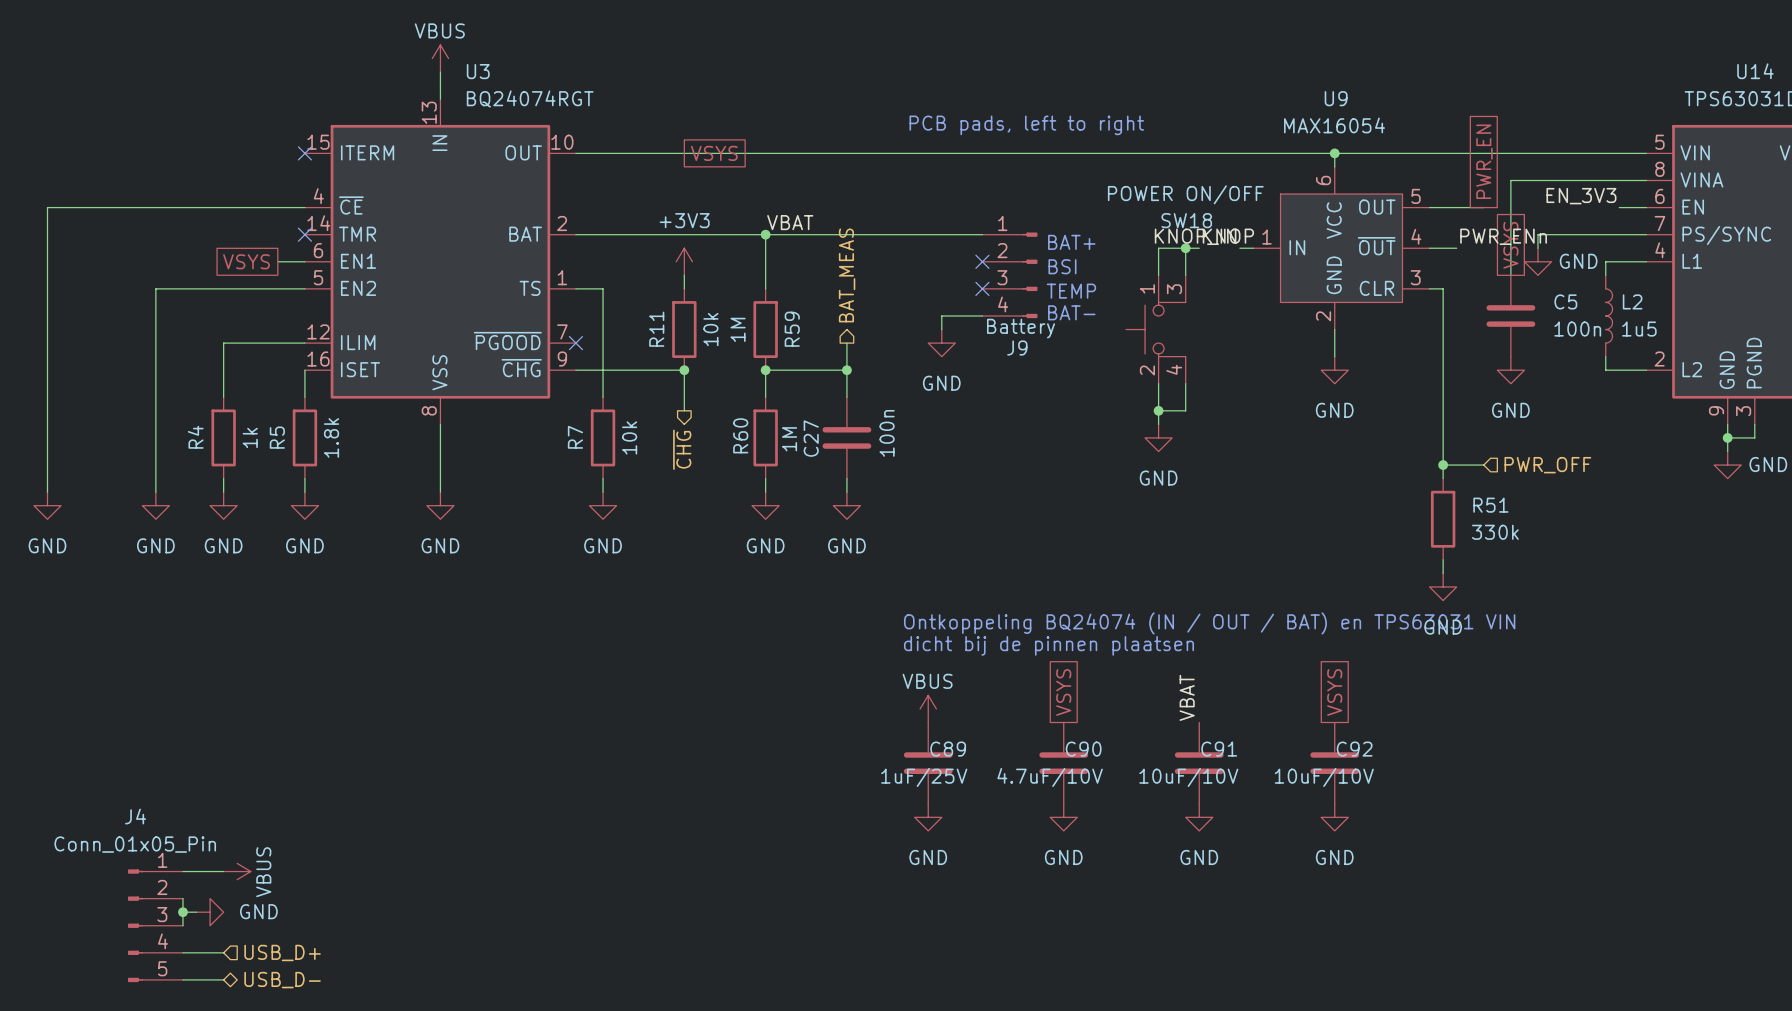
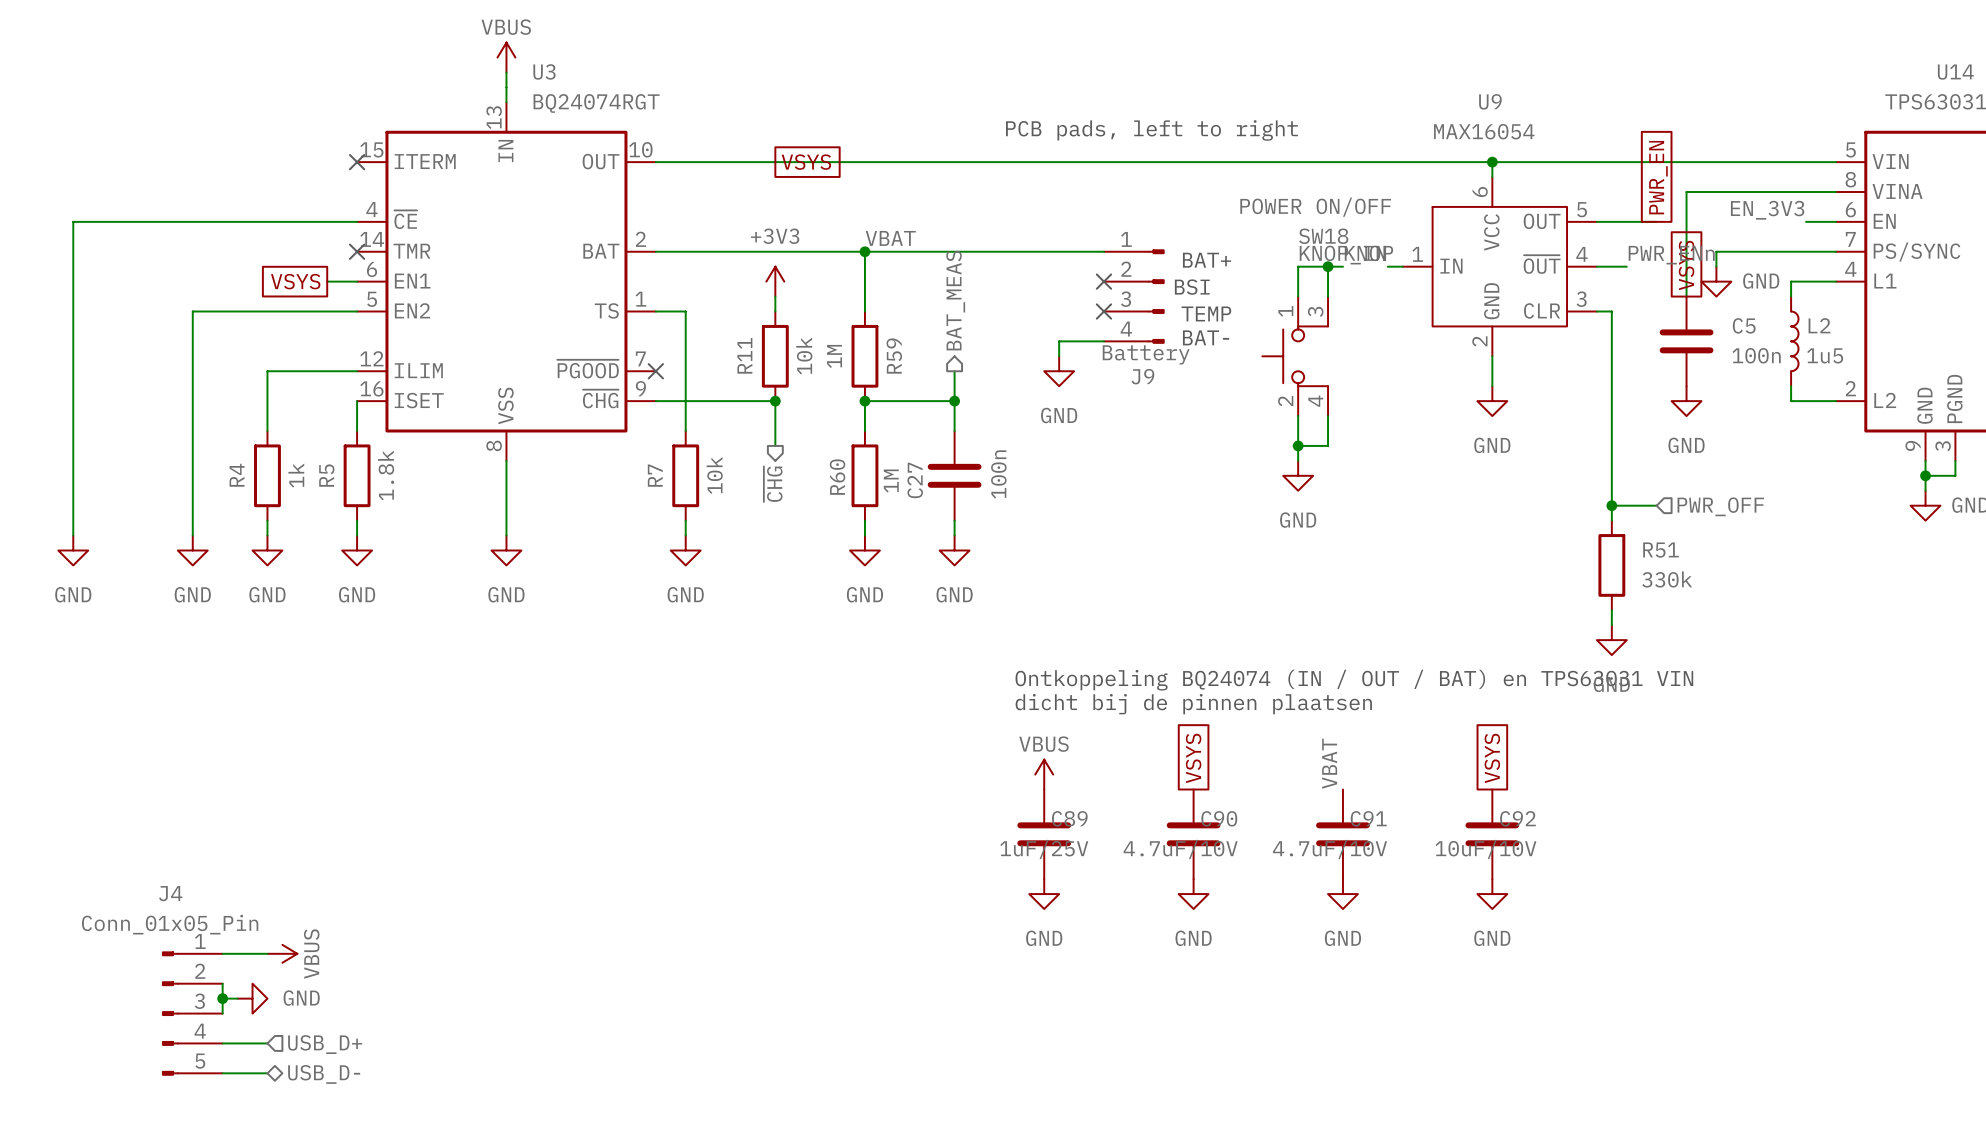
C91 value: 10uF/10V (1188, 777) -> 4.7uF/10V (1329, 849)

